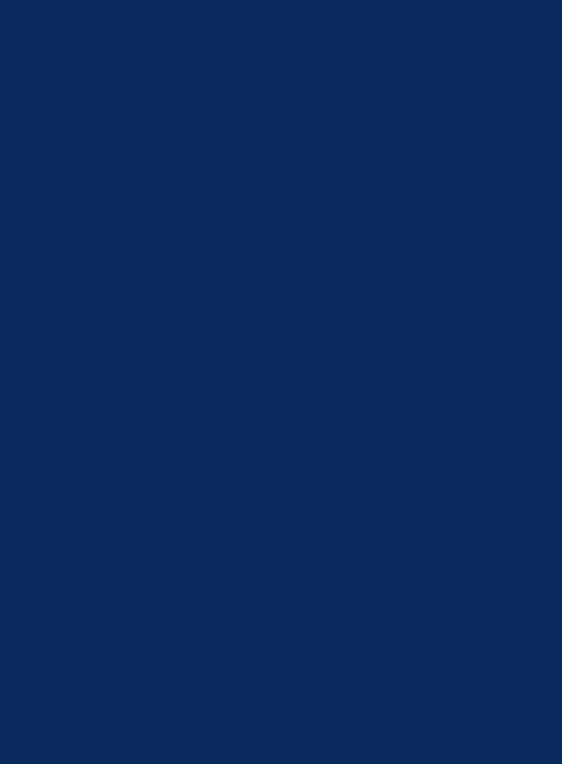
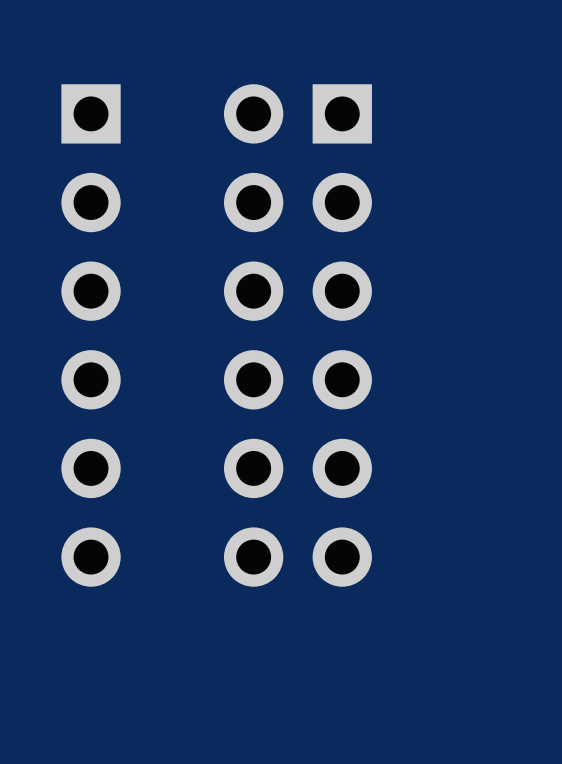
part: none -> (91, 335)
part: none -> (297, 335)

